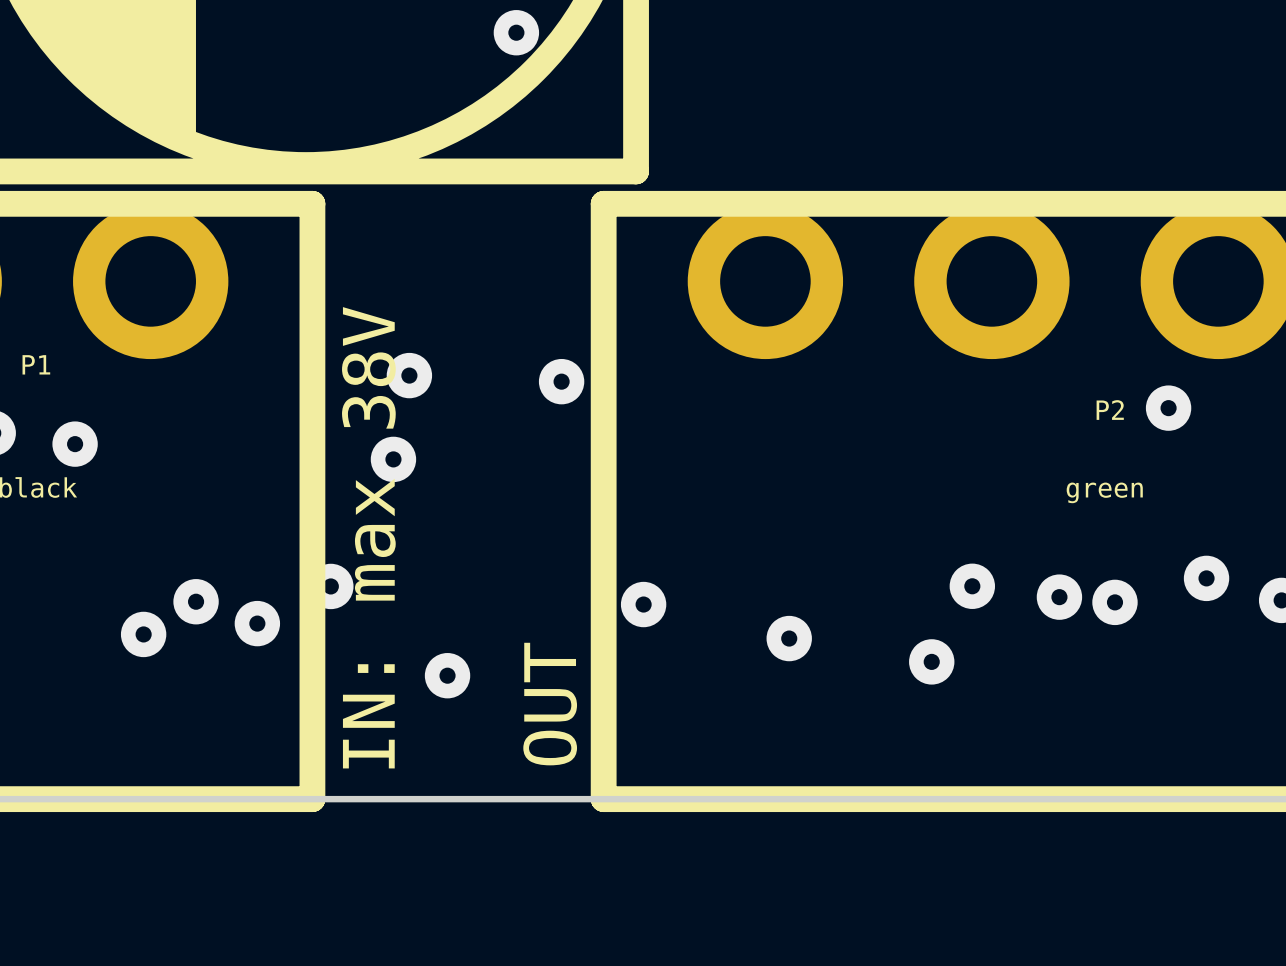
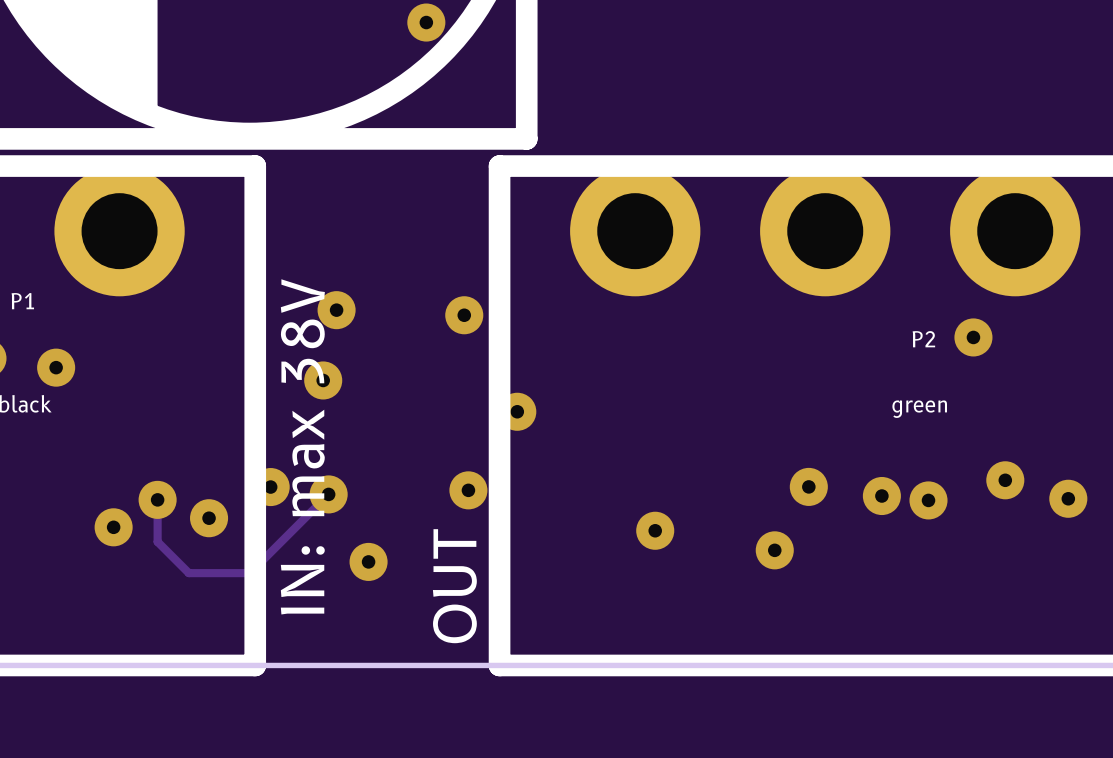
via: none -> (517, 411)
via: none -> (468, 490)
track: none -> (328, 494) (249, 573) (188, 573) (157, 541) (157, 499)
via: none -> (328, 494)
via: (643, 604) -> none

